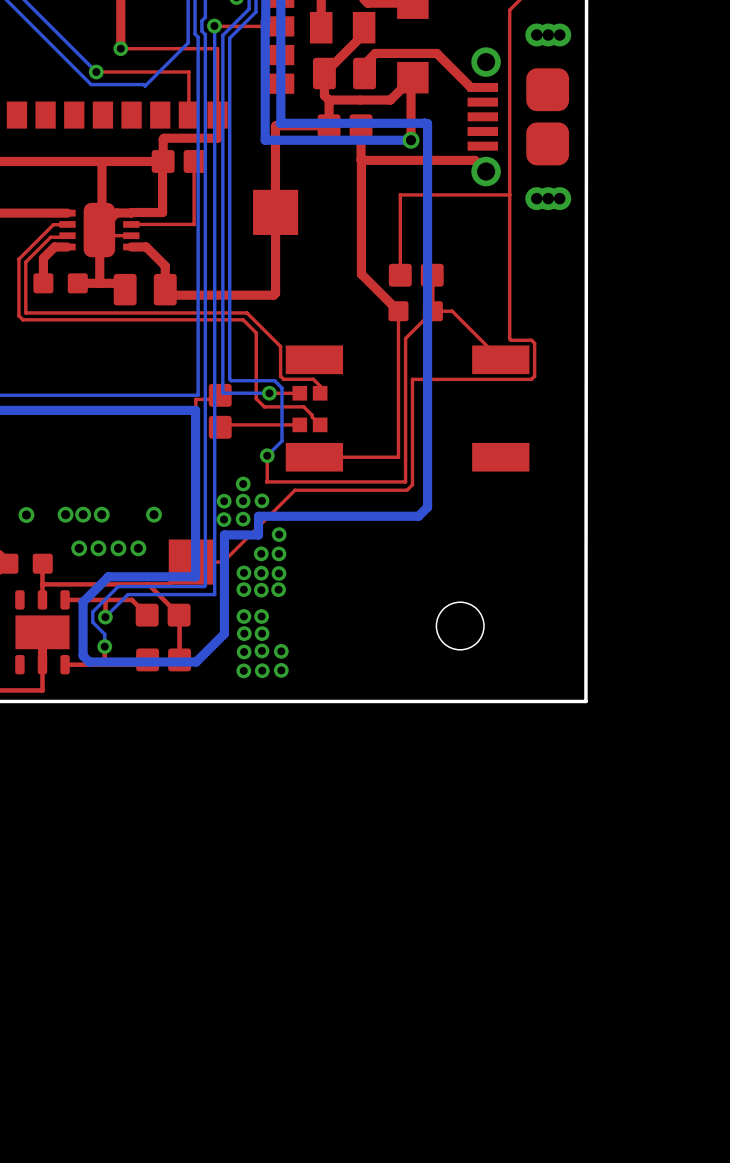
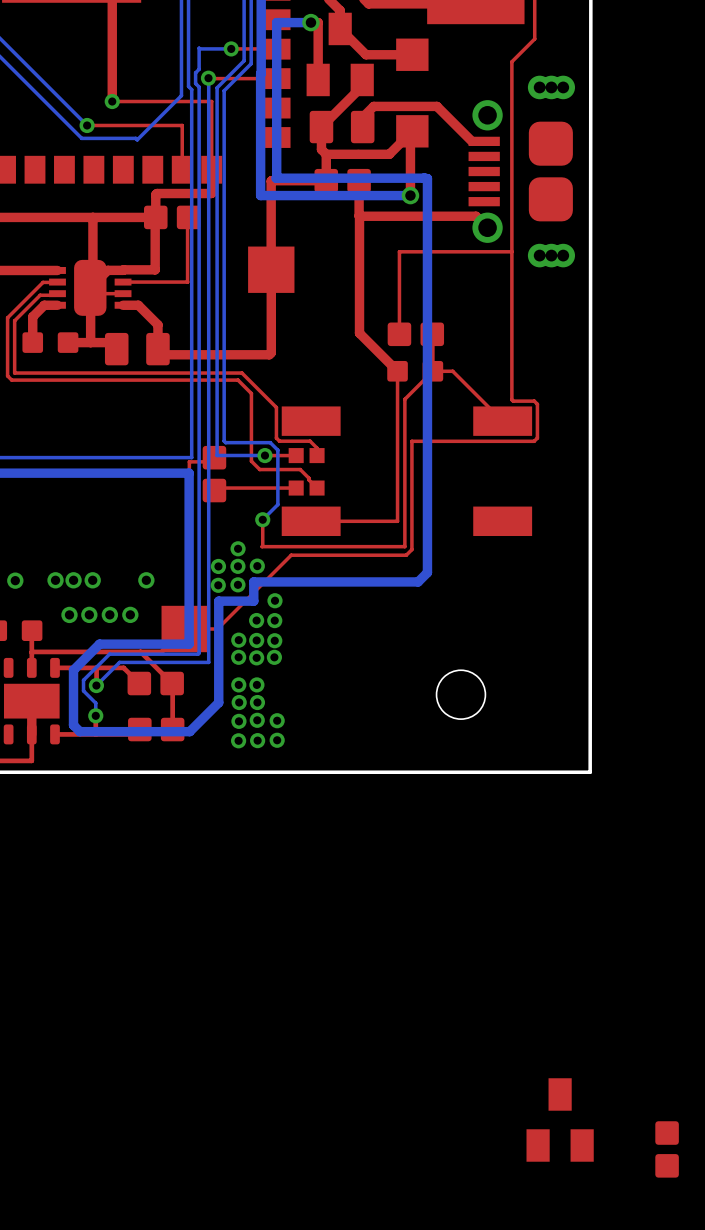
part: none -> (560, 1119)
part: none -> (667, 1149)

